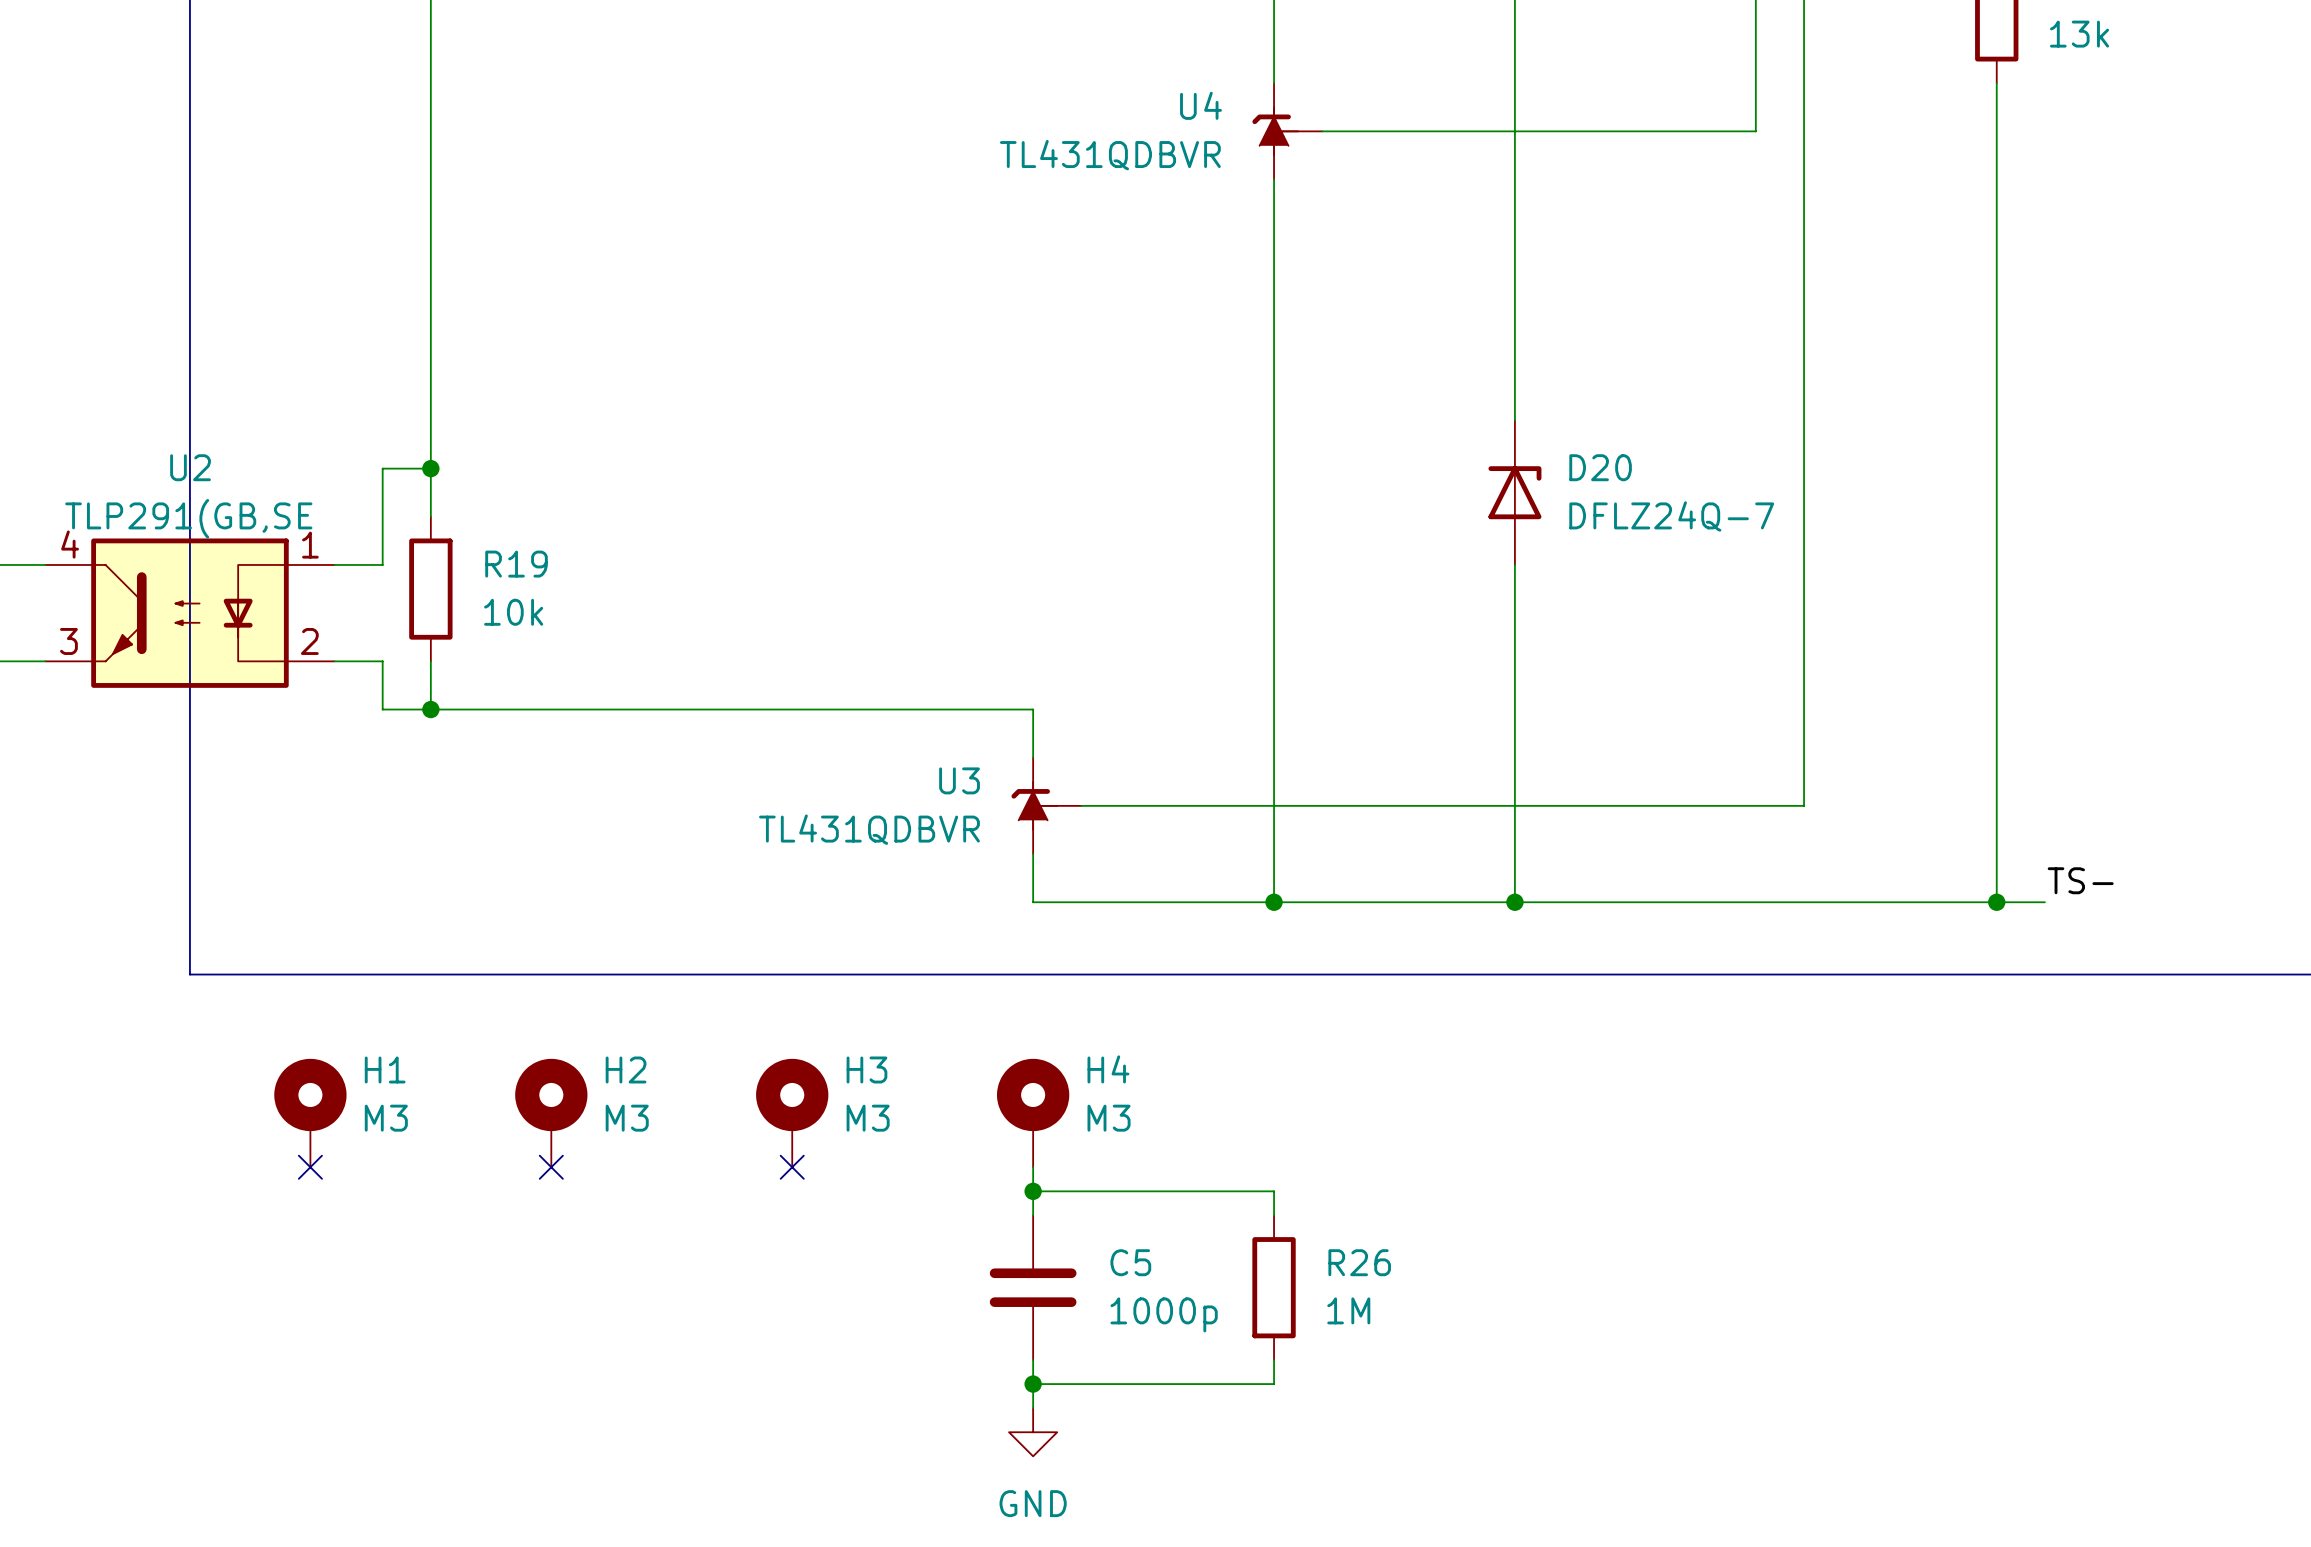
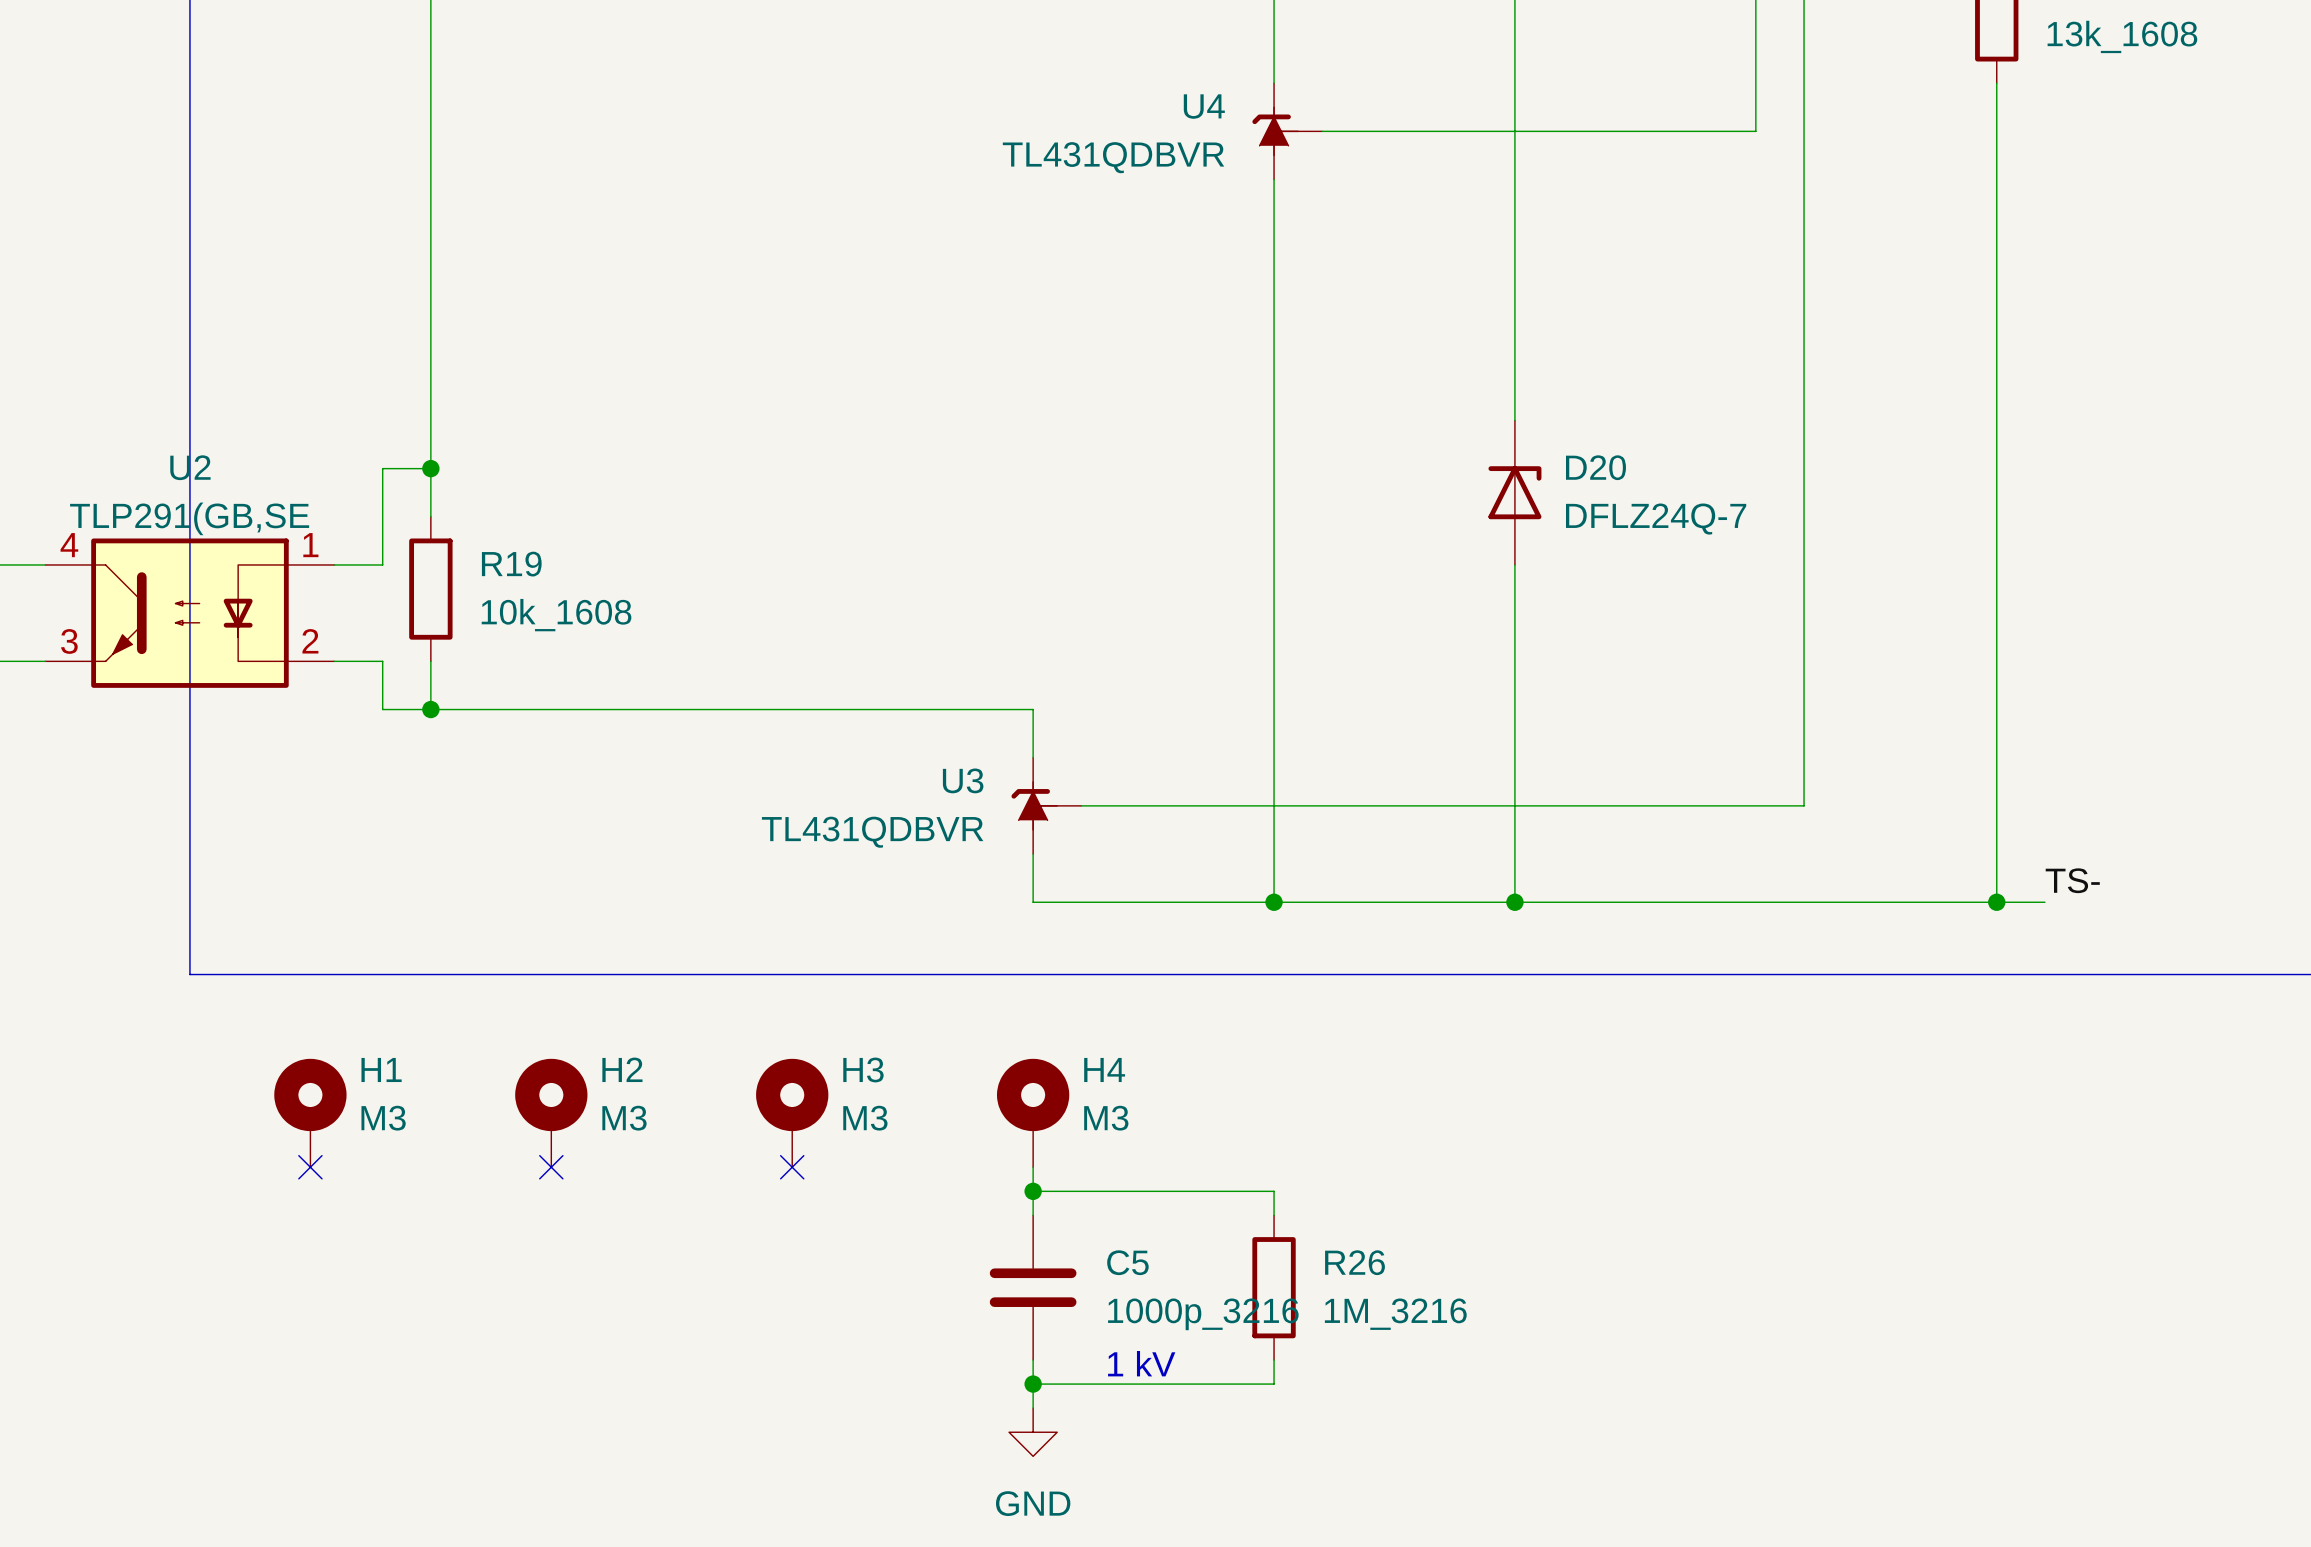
part value: 13k (2079, 34) -> 13k_1608 (2122, 36)
R19 value: 10k (513, 612) -> 10k_1608 (556, 615)
R26 value: 1M (1348, 1310) -> 1M_3216 (1395, 1314)
C5 value: 1000p (1164, 1314) -> 1000p_3216 (1203, 1314)
text: none -> 1 kV (1141, 1363)

